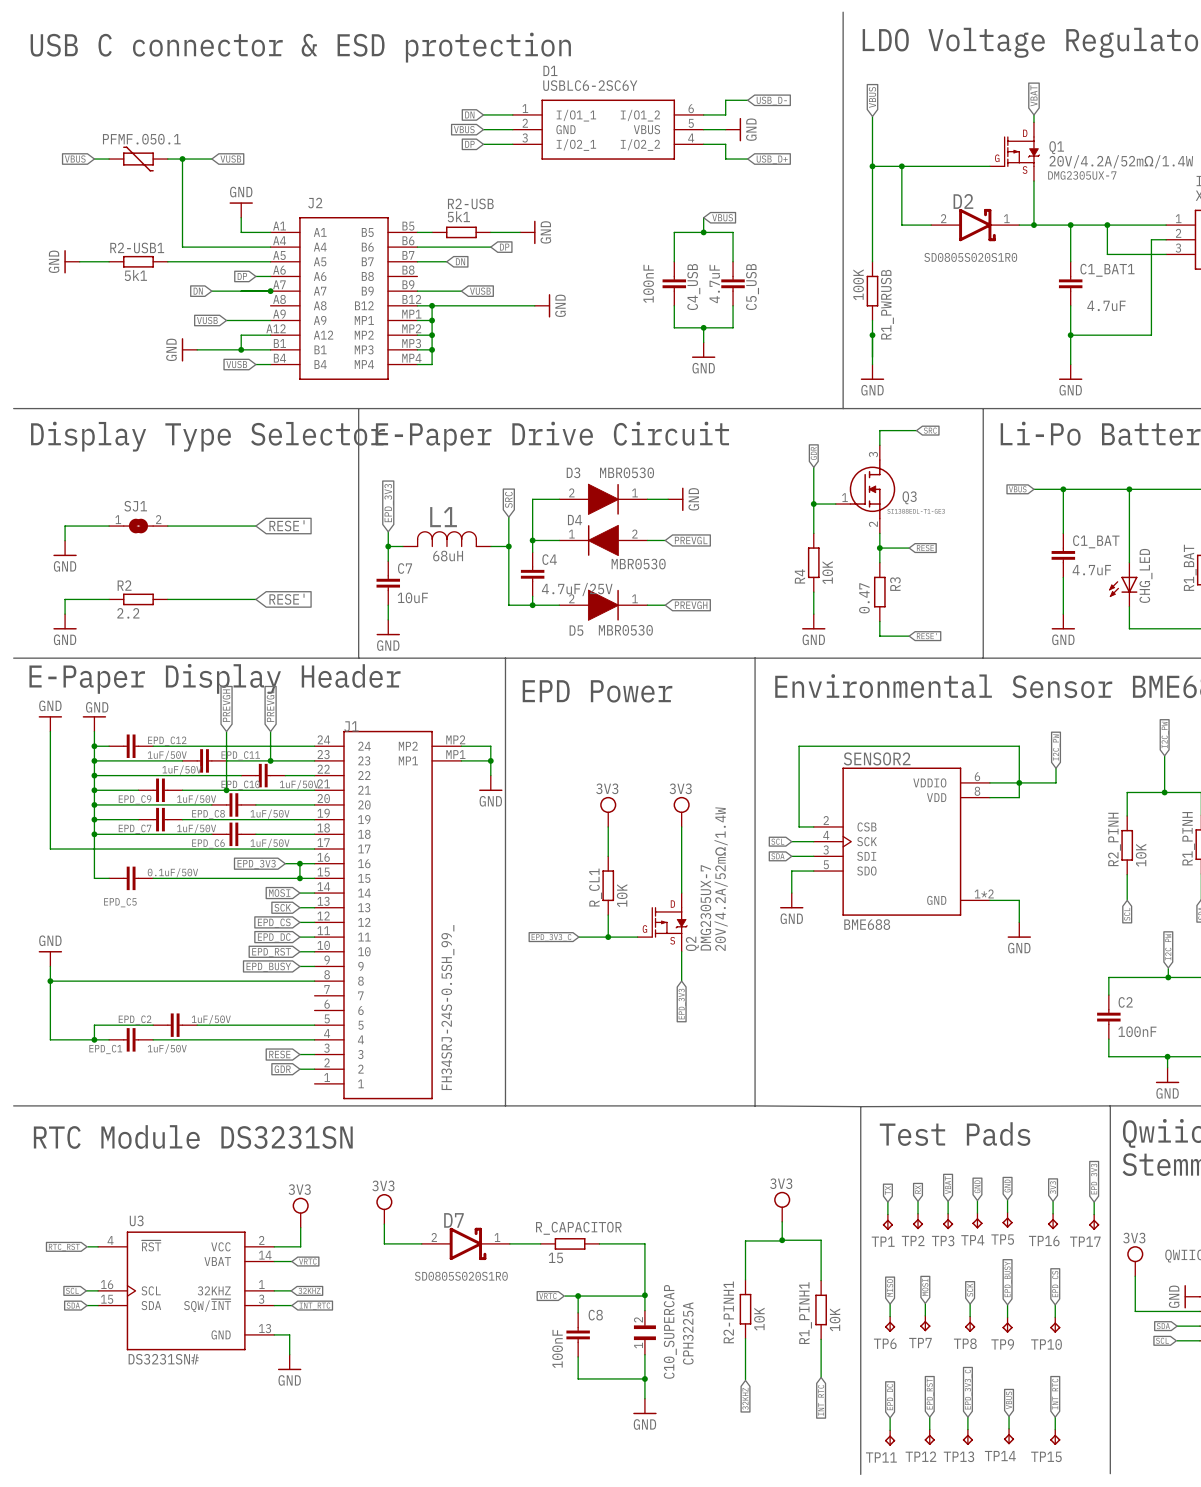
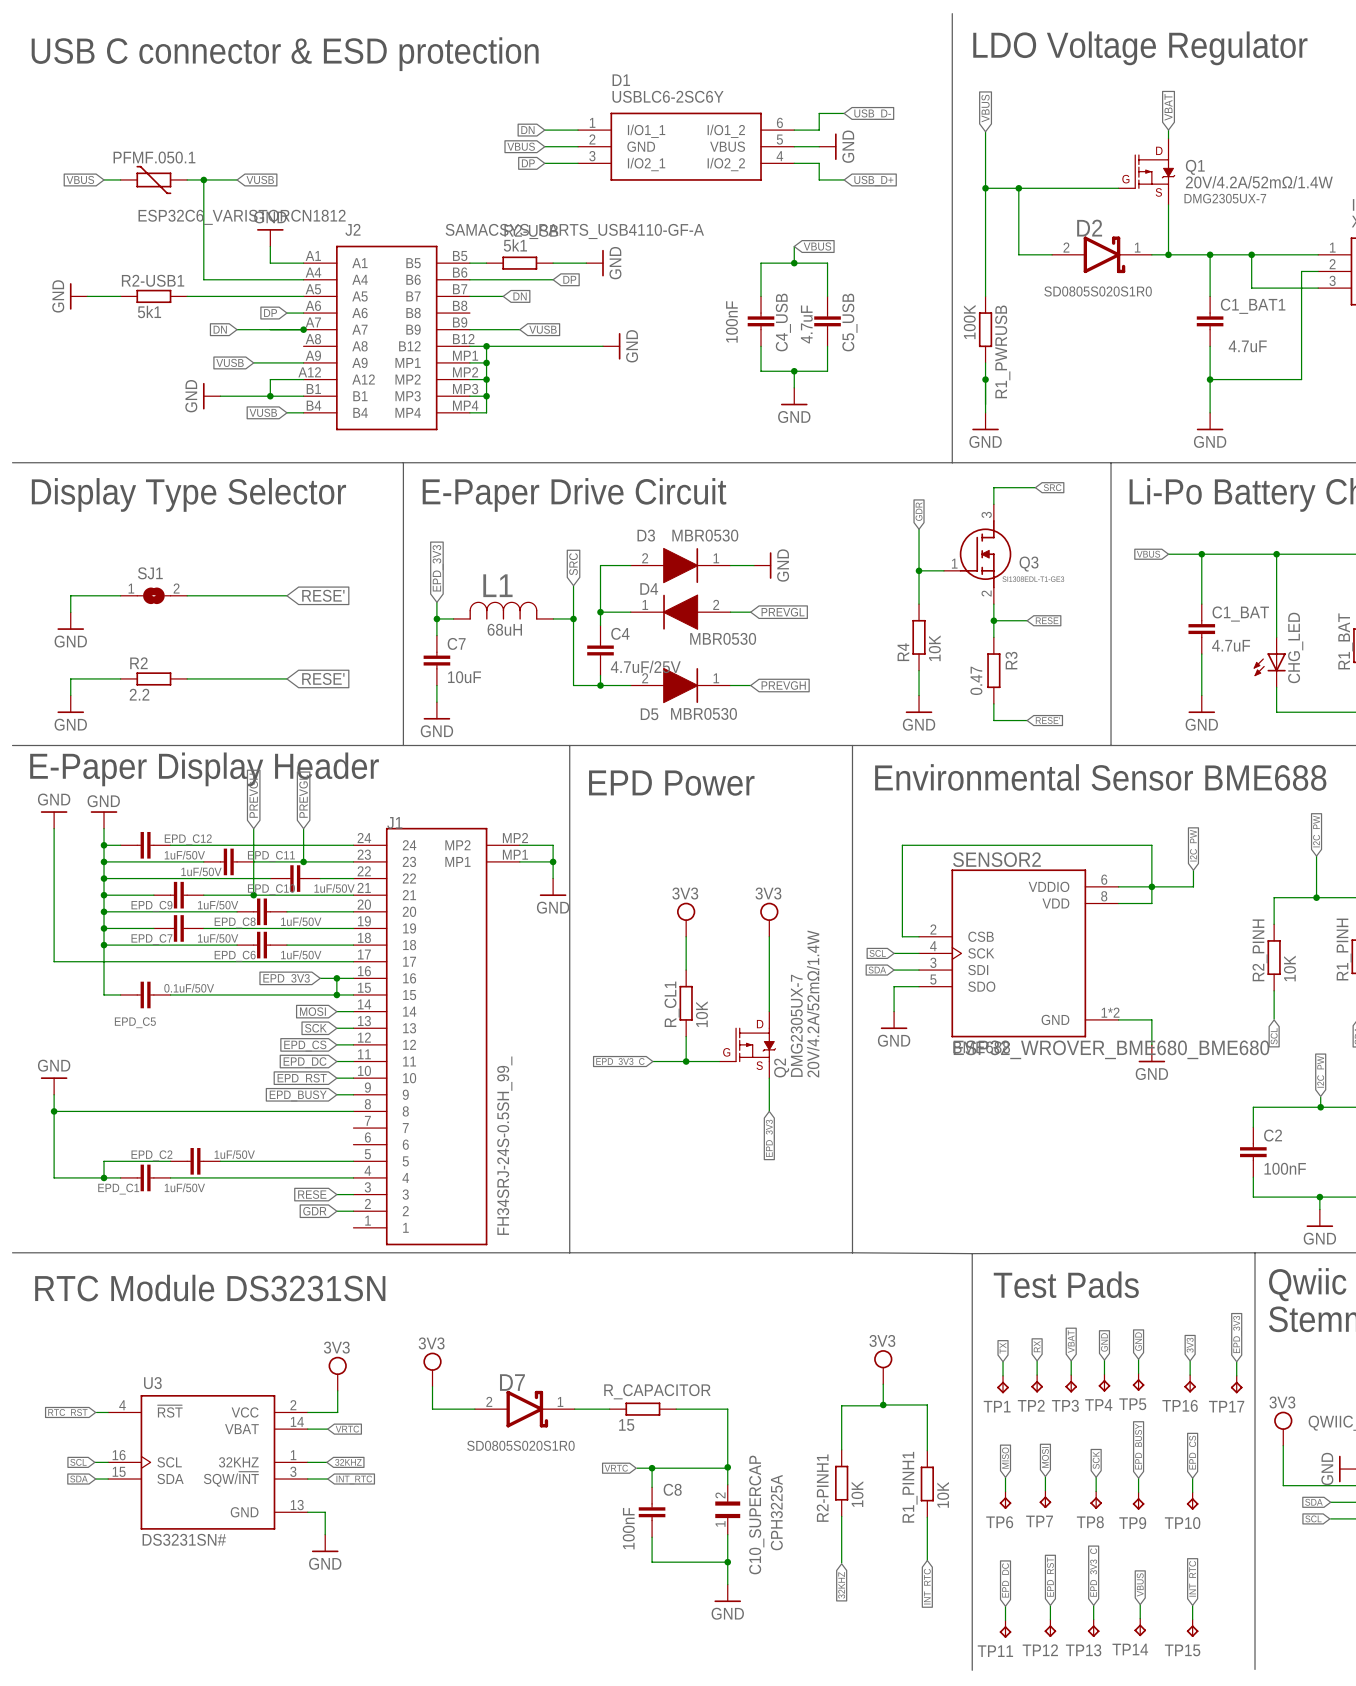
PFMF.050.1 value: none -> ESP32C6_VARISTORCN1812 (242, 217)
J2 value: none -> SAMACSYS_PARTS_USB4110-GF-A (574, 231)
SENSOR2 value: none -> ESP32_WROVER_BME680_BME680 (1111, 1049)

